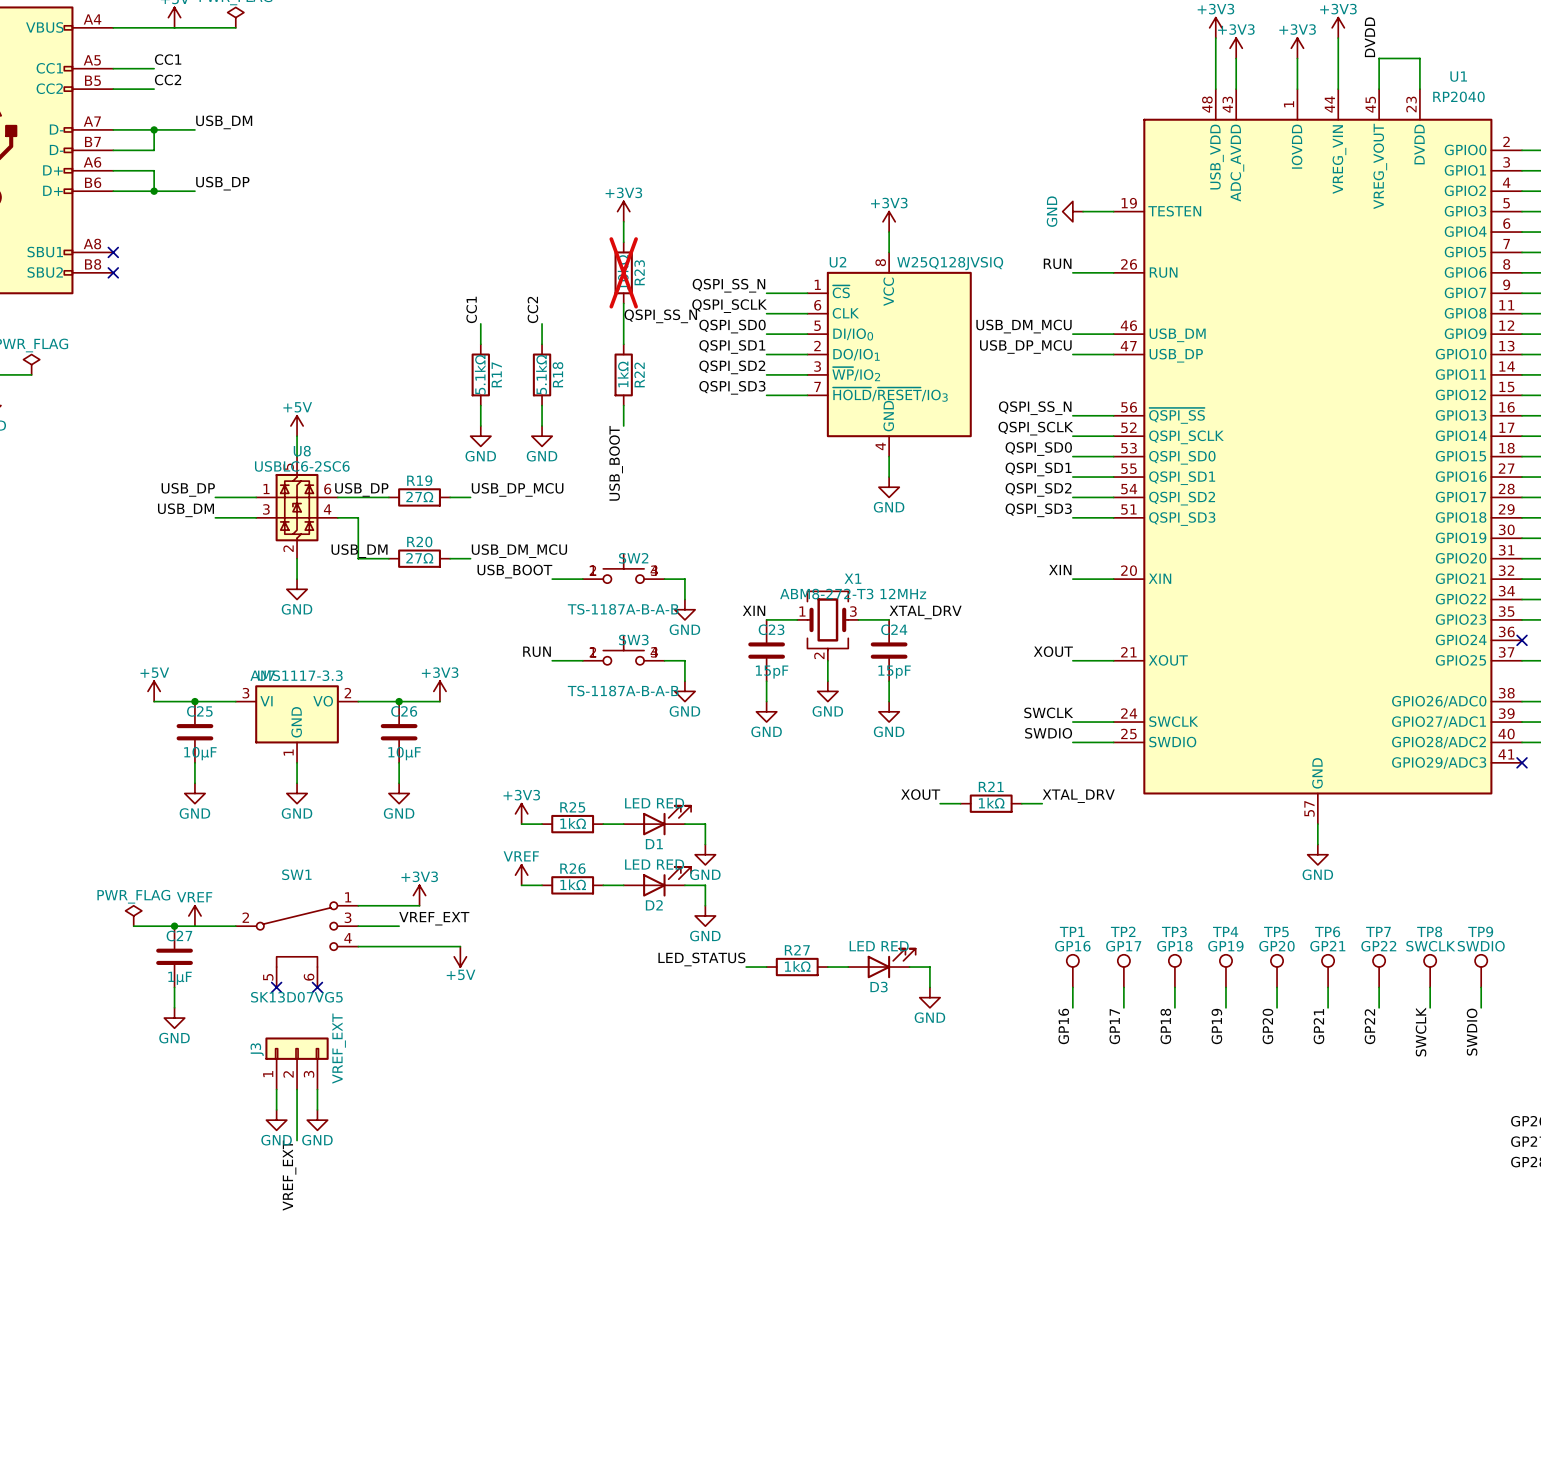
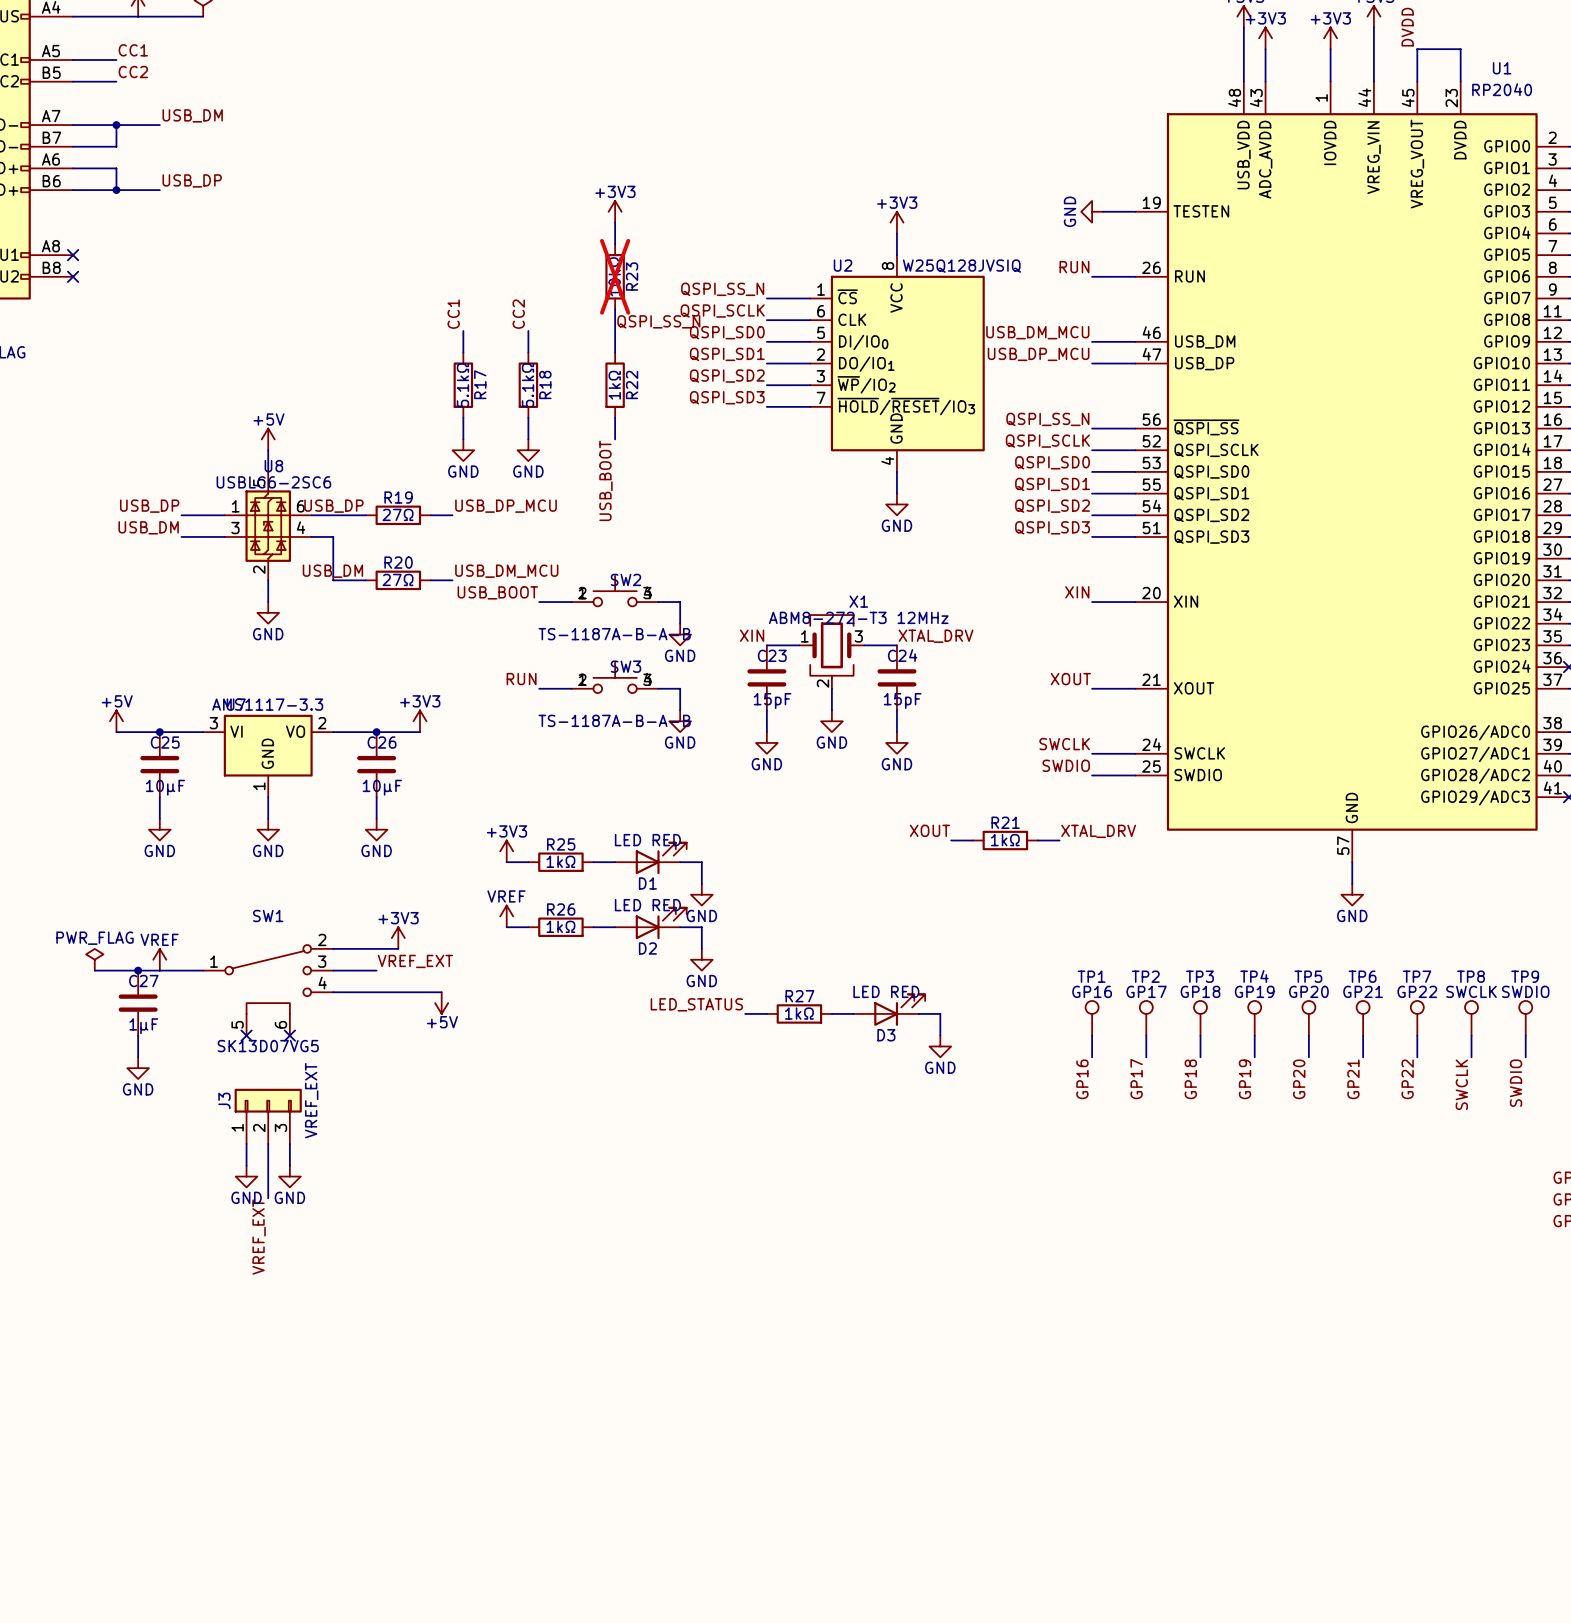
SW1 pin number: 1 (348, 897) -> 2 (322, 939)
SW1 pin number: 2 (245, 917) -> 1 (214, 961)

